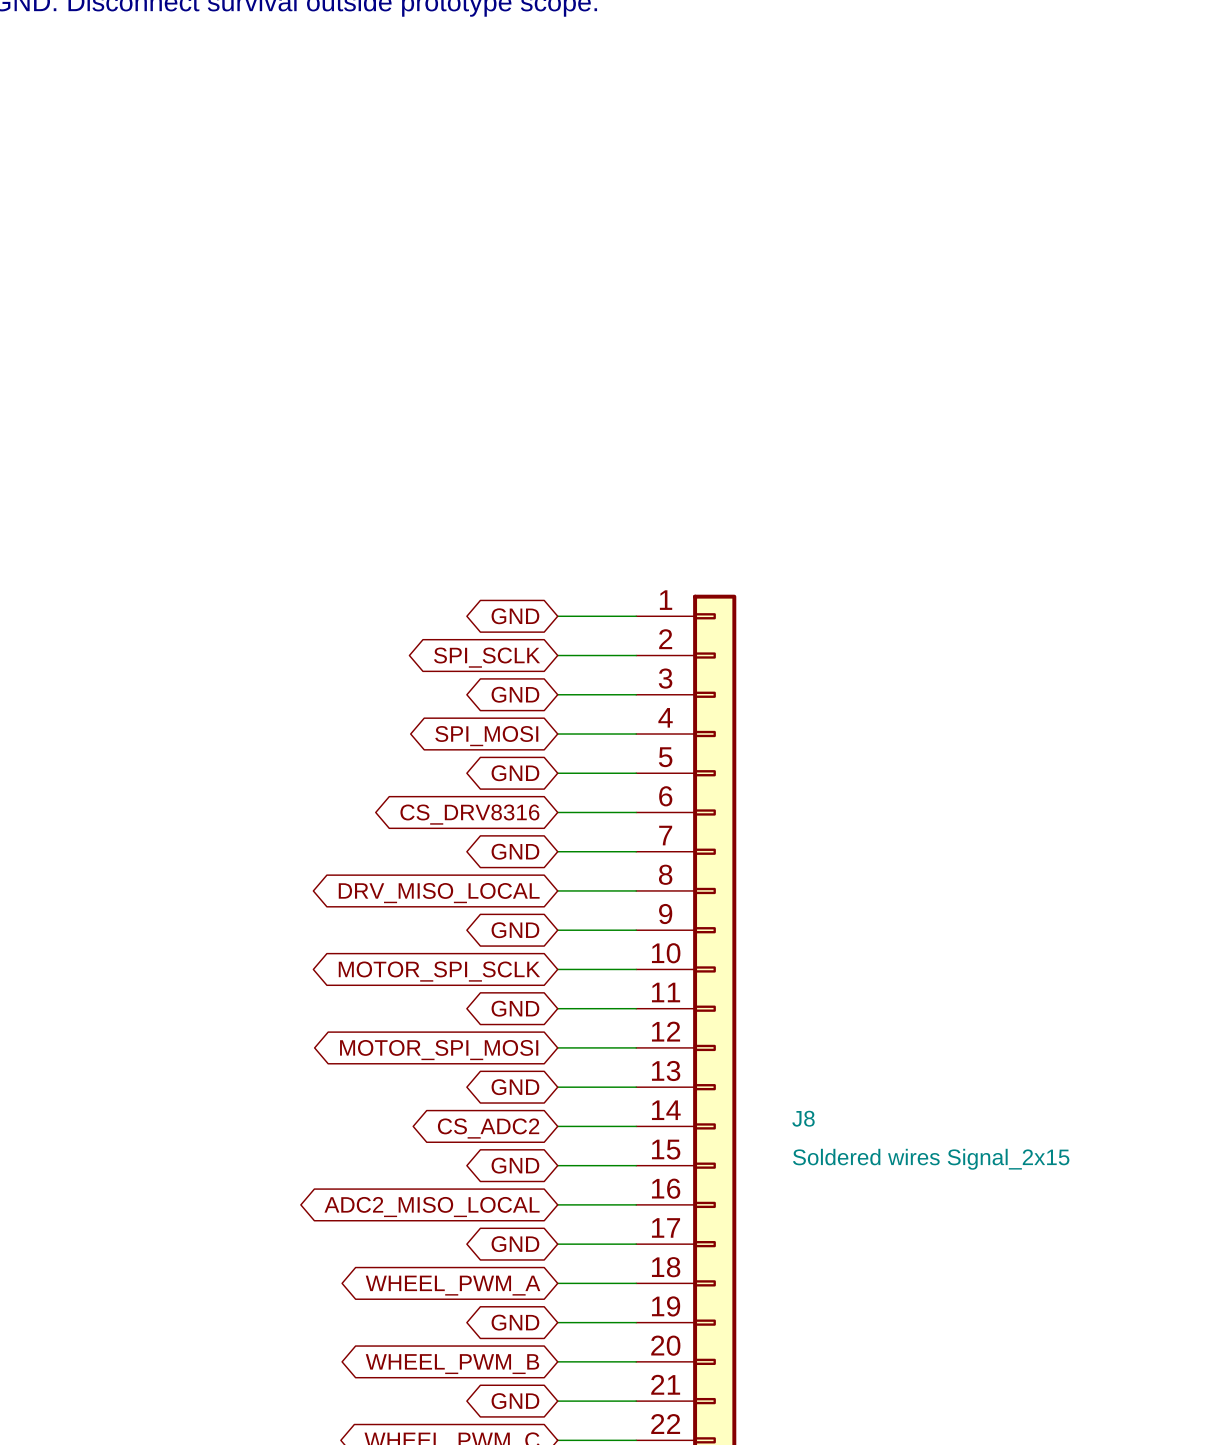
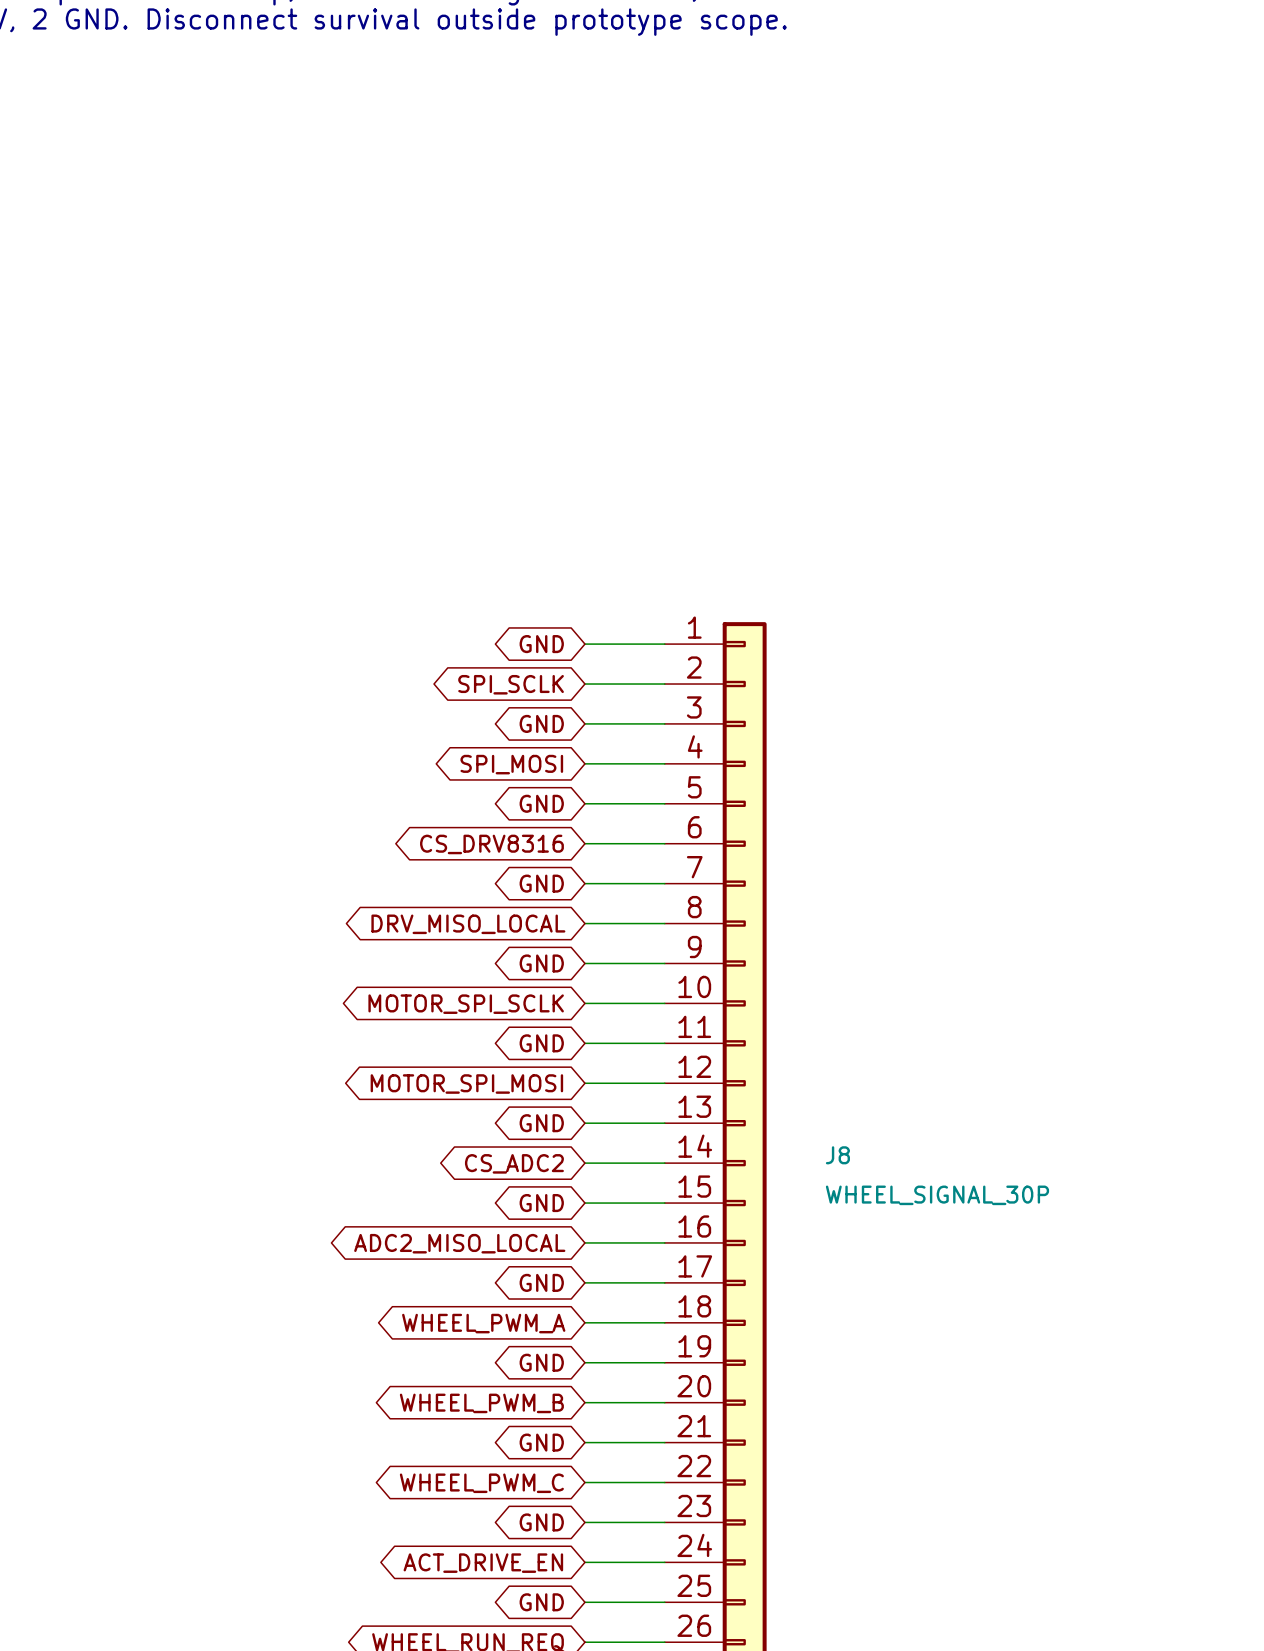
J8 value: Soldered wires Signal_2x15 (931, 1159) -> WHEEL_SIGNAL_30P (937, 1195)

